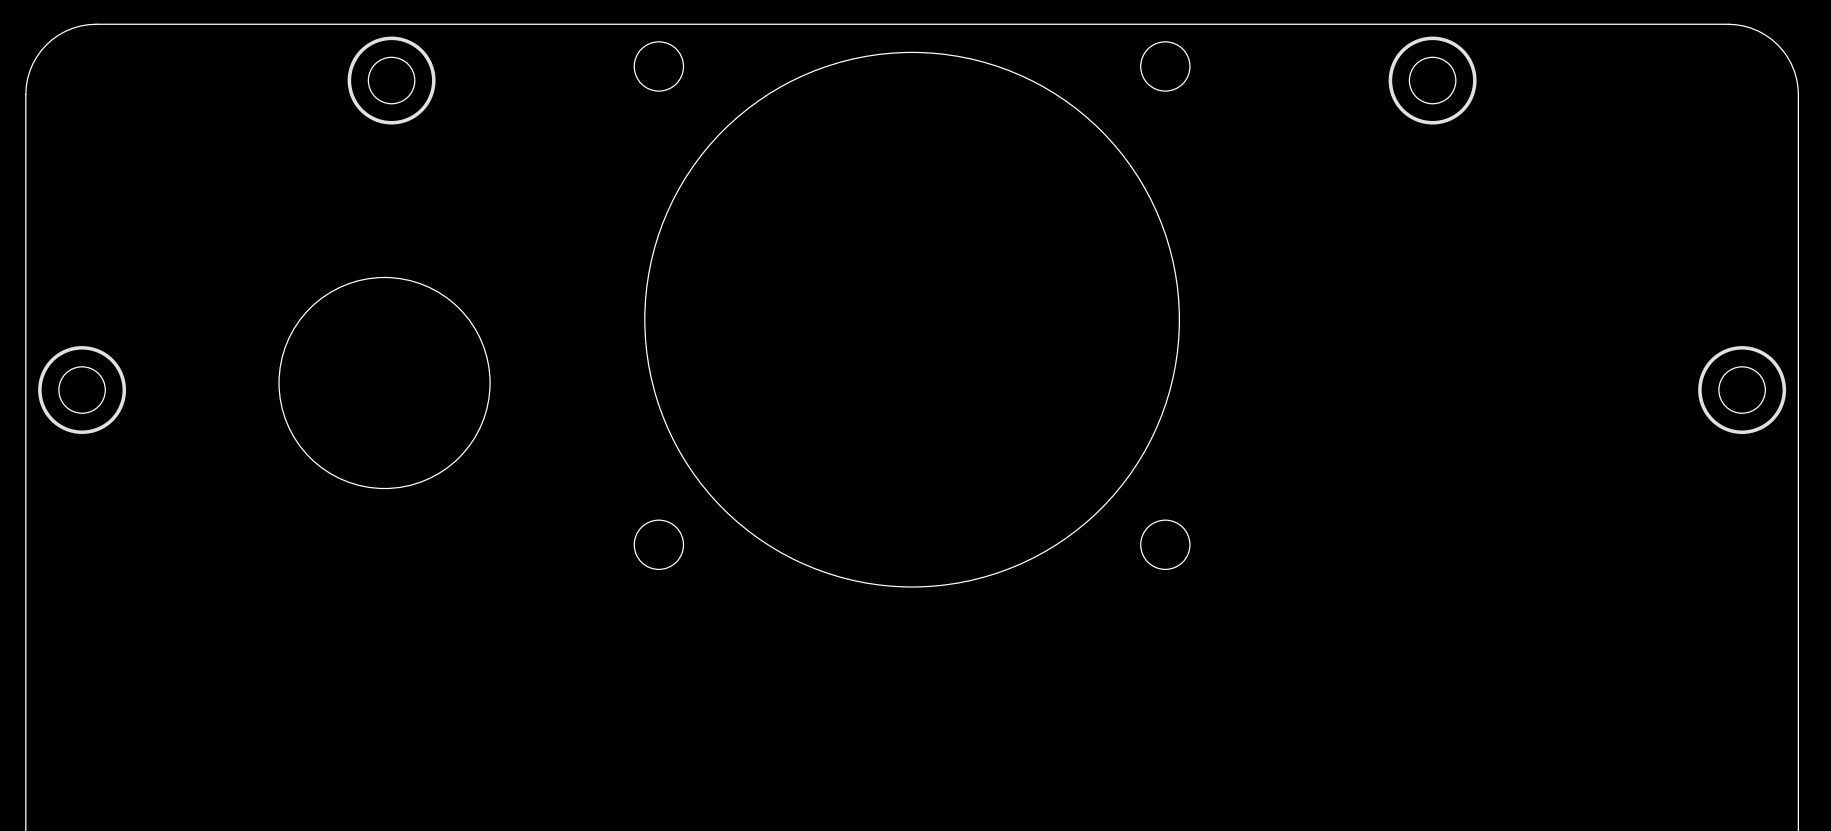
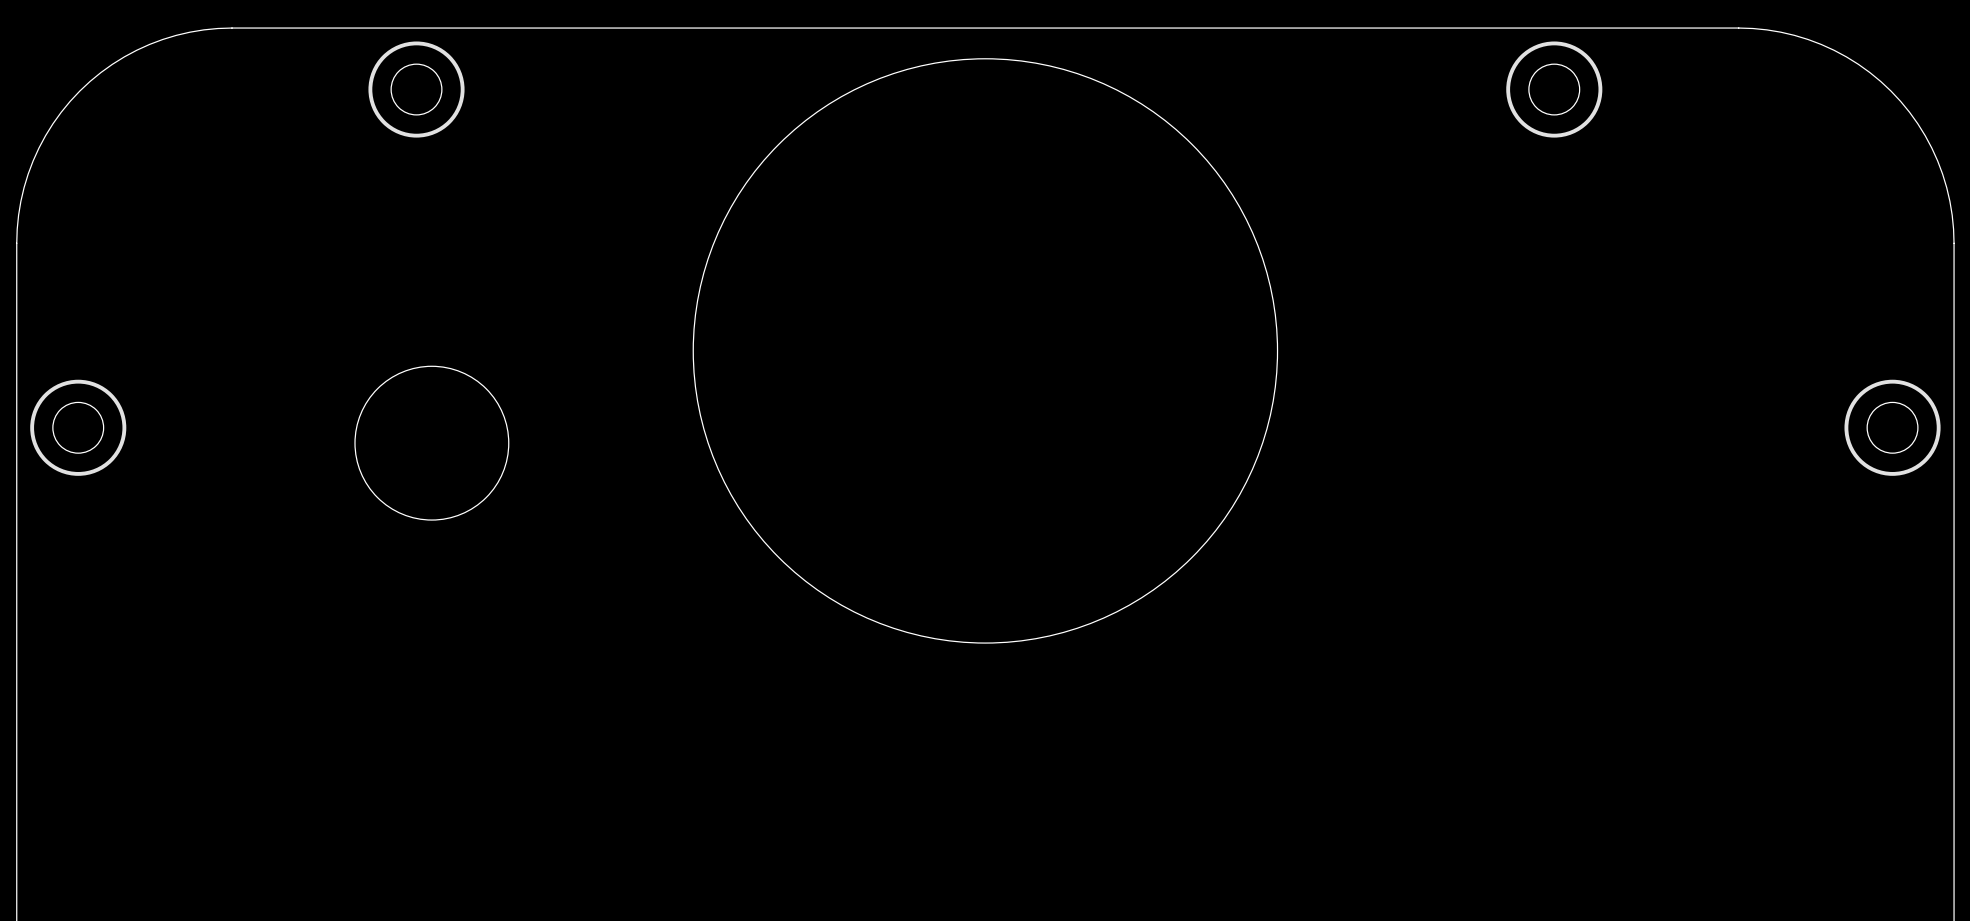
board edge: (222, 24) (88, 24) (65, 31) (46, 44) (32, 64) (26, 86) (25, 221) -> (232, 28) (190, 32) (149, 44) (112, 64) (79, 91) (53, 123) (33, 160) (20, 201) (16, 243)
board edge: (1601, 24) (1735, 24) (1758, 31) (1777, 44) (1791, 64) (1797, 86) (1798, 221) -> (1738, 28) (1780, 32) (1821, 44) (1858, 64) (1890, 91) (1917, 123) (1937, 160) (1949, 201) (1954, 243)
round board edge: [634, 41, 684, 92] -> none
round board edge: [1140, 41, 1190, 92] -> none
round board edge: [279, 277, 491, 489] -> none
round board edge: none -> [354, 366, 509, 521]
round board edge: [634, 520, 684, 570] -> none
round board edge: [1140, 520, 1190, 570] -> none

